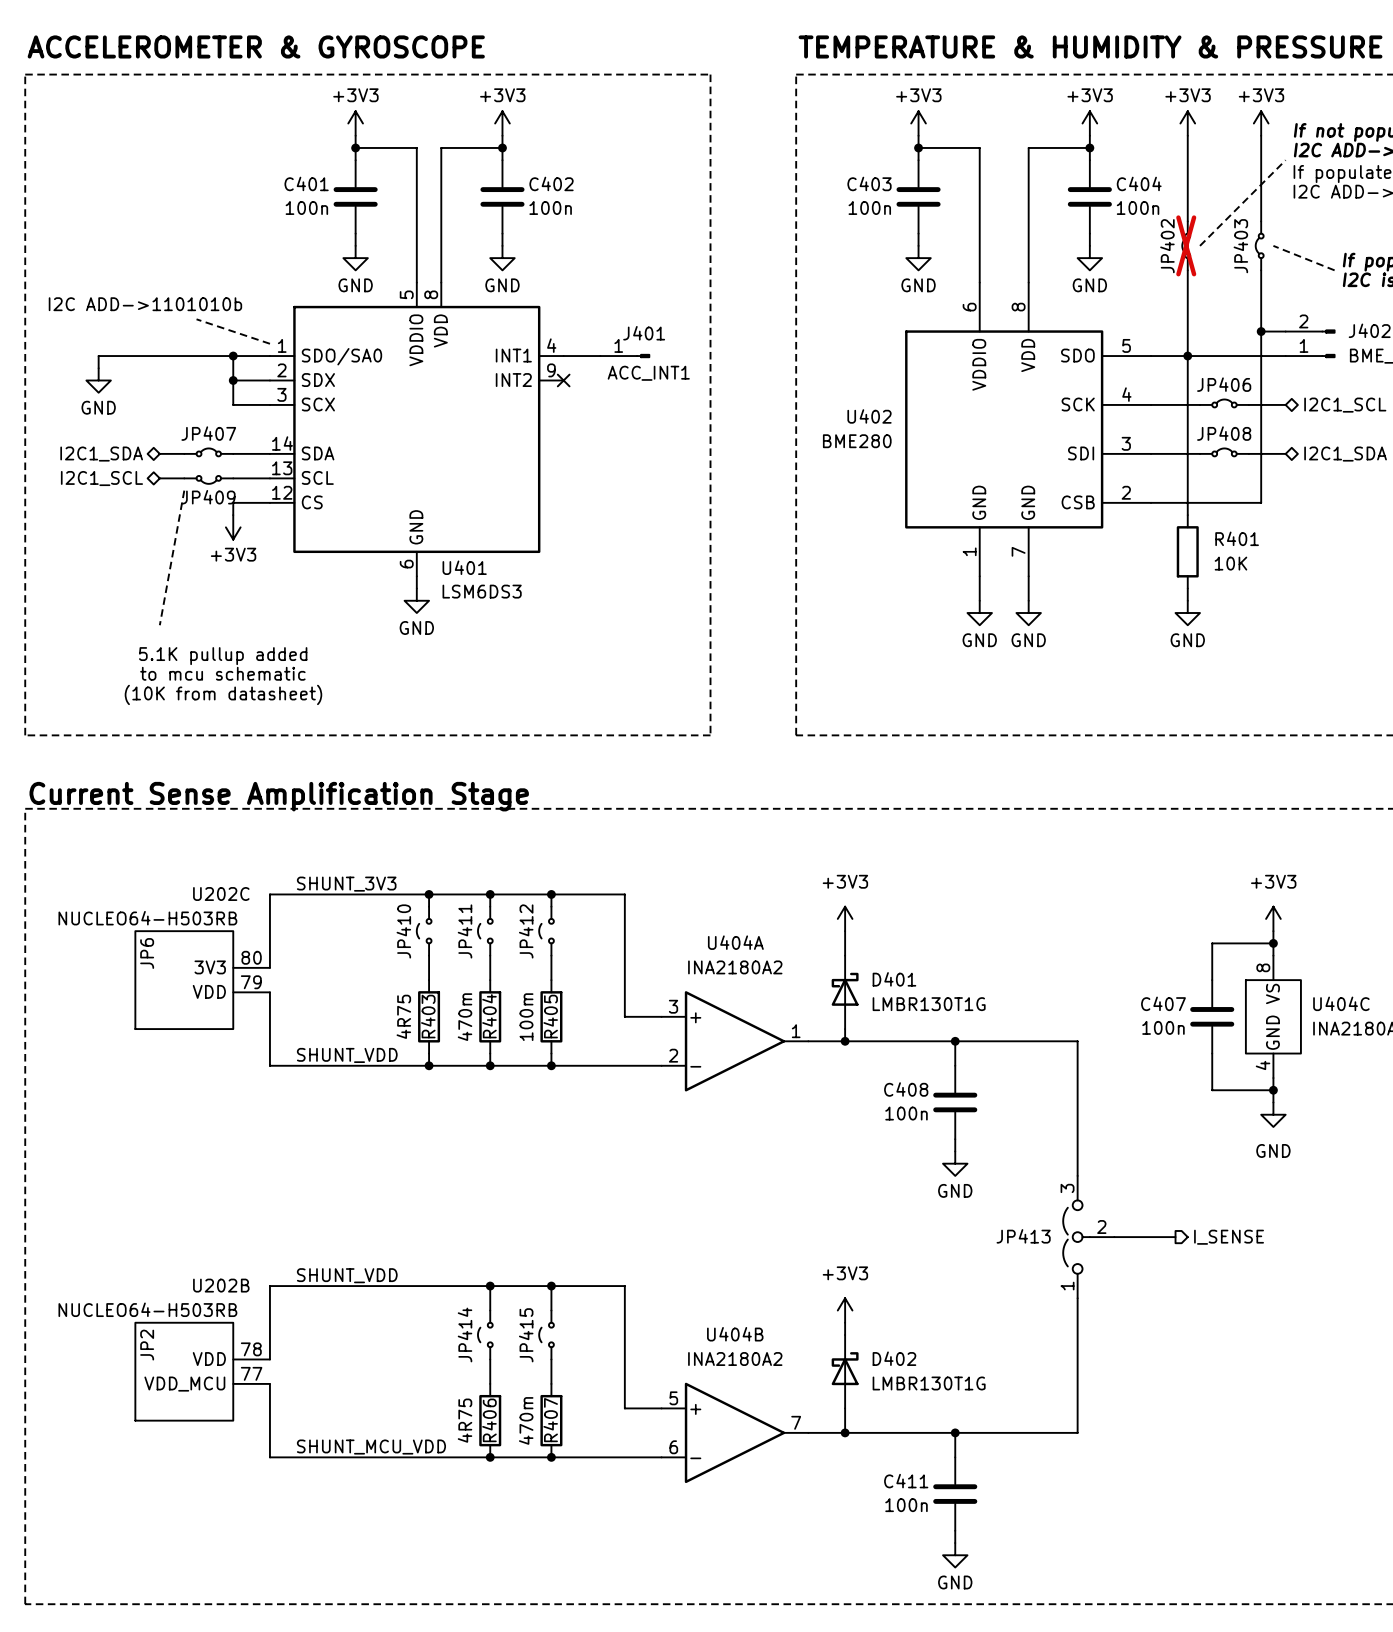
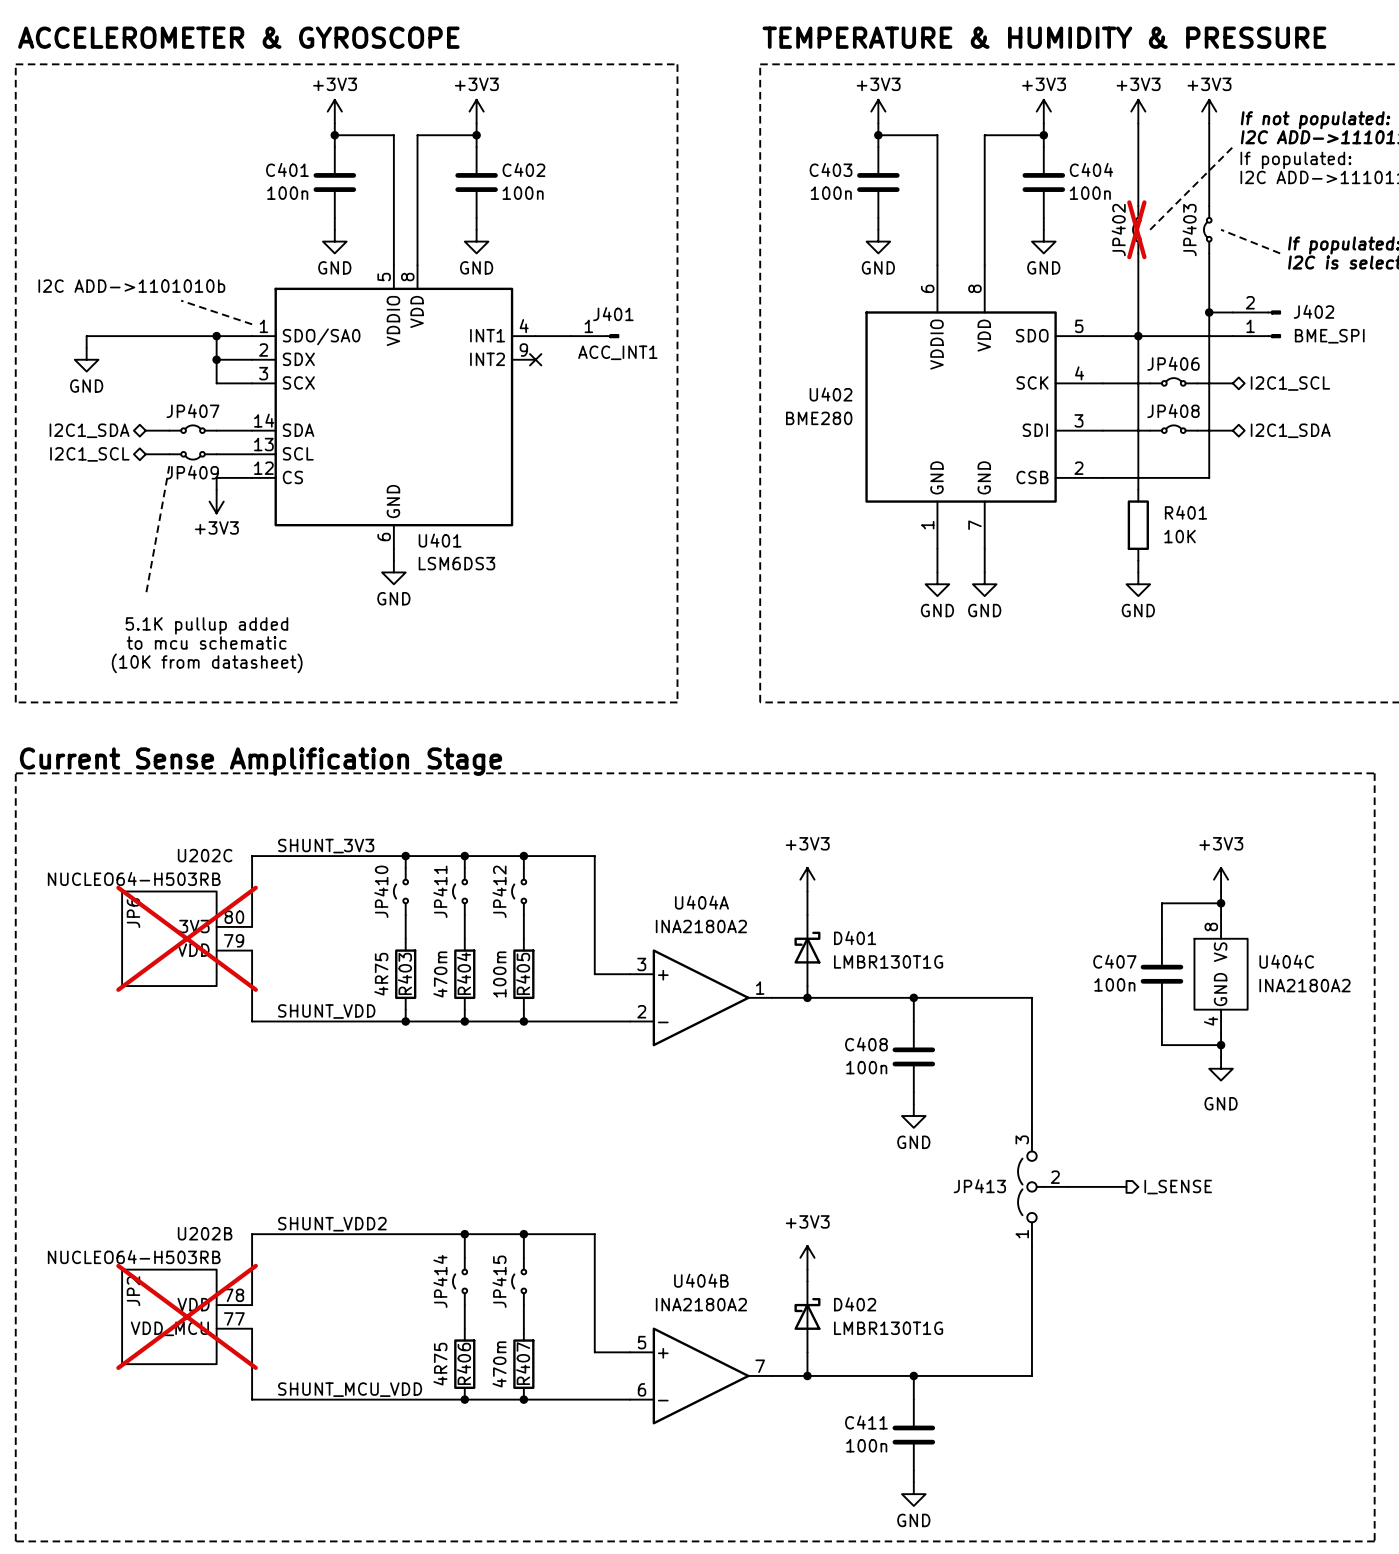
U202C do-not-place cross: none -> (187, 938)
label: SHUNT_VDD (347, 1275) -> SHUNT_VDD2 (332, 1224)
U202B do-not-place cross: none -> (187, 1316)

